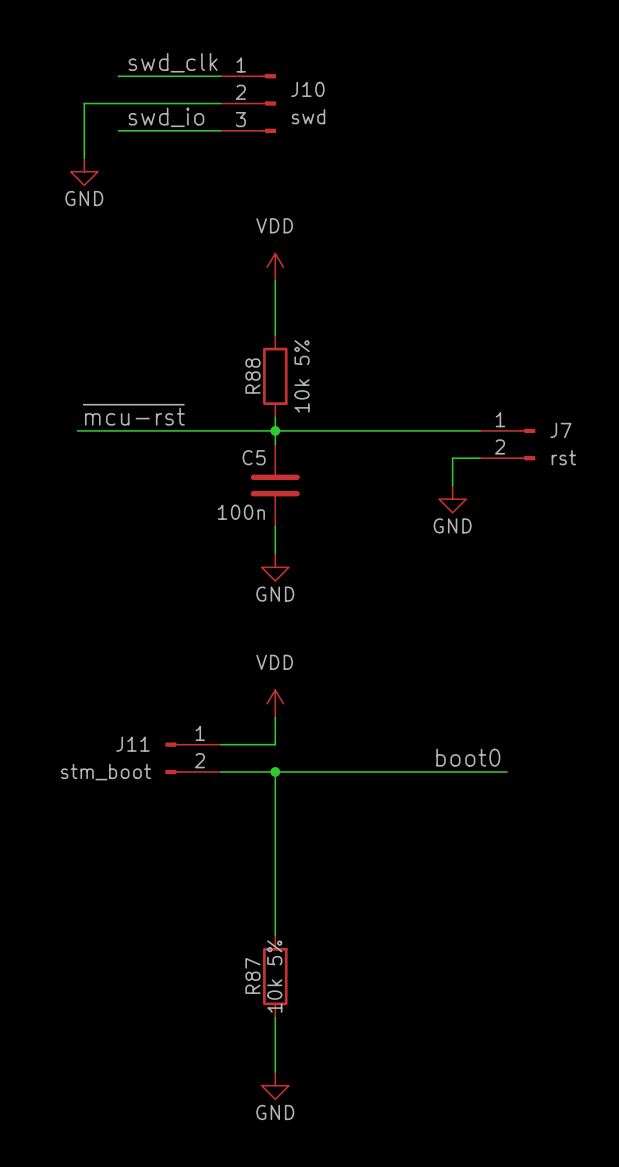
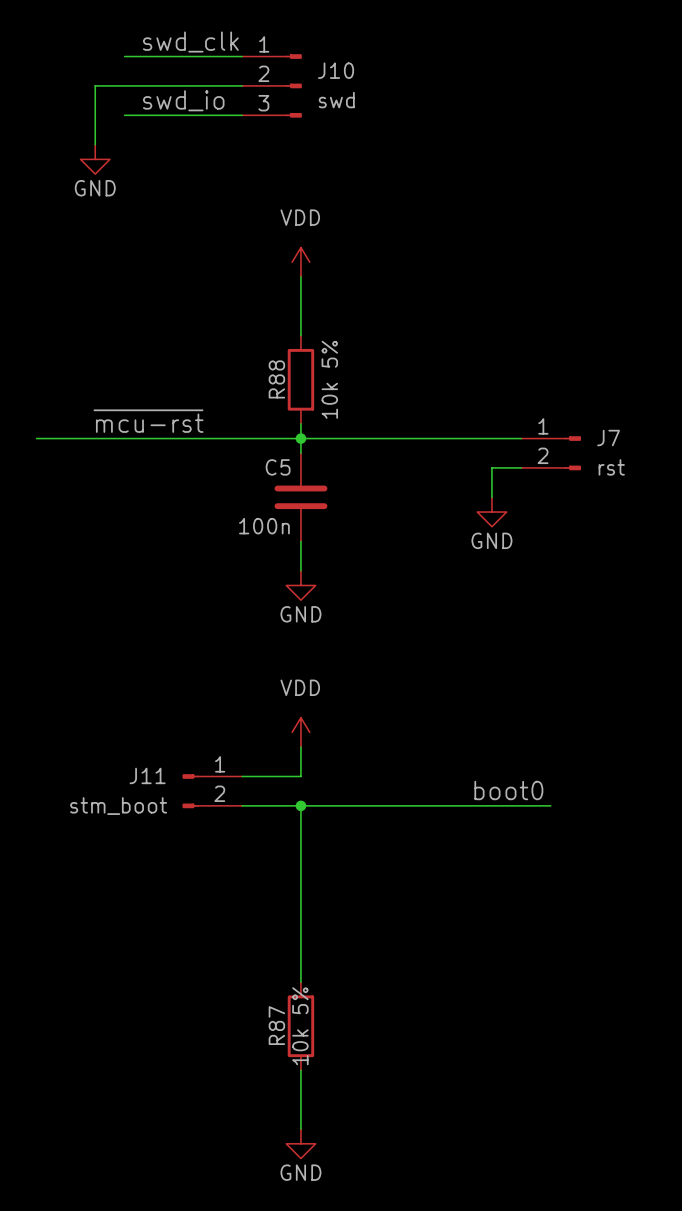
wire: none -> (124, 56) (131, 56)
wire: none -> (124, 115) (131, 115)
wire: none -> (36, 438) (87, 438)

